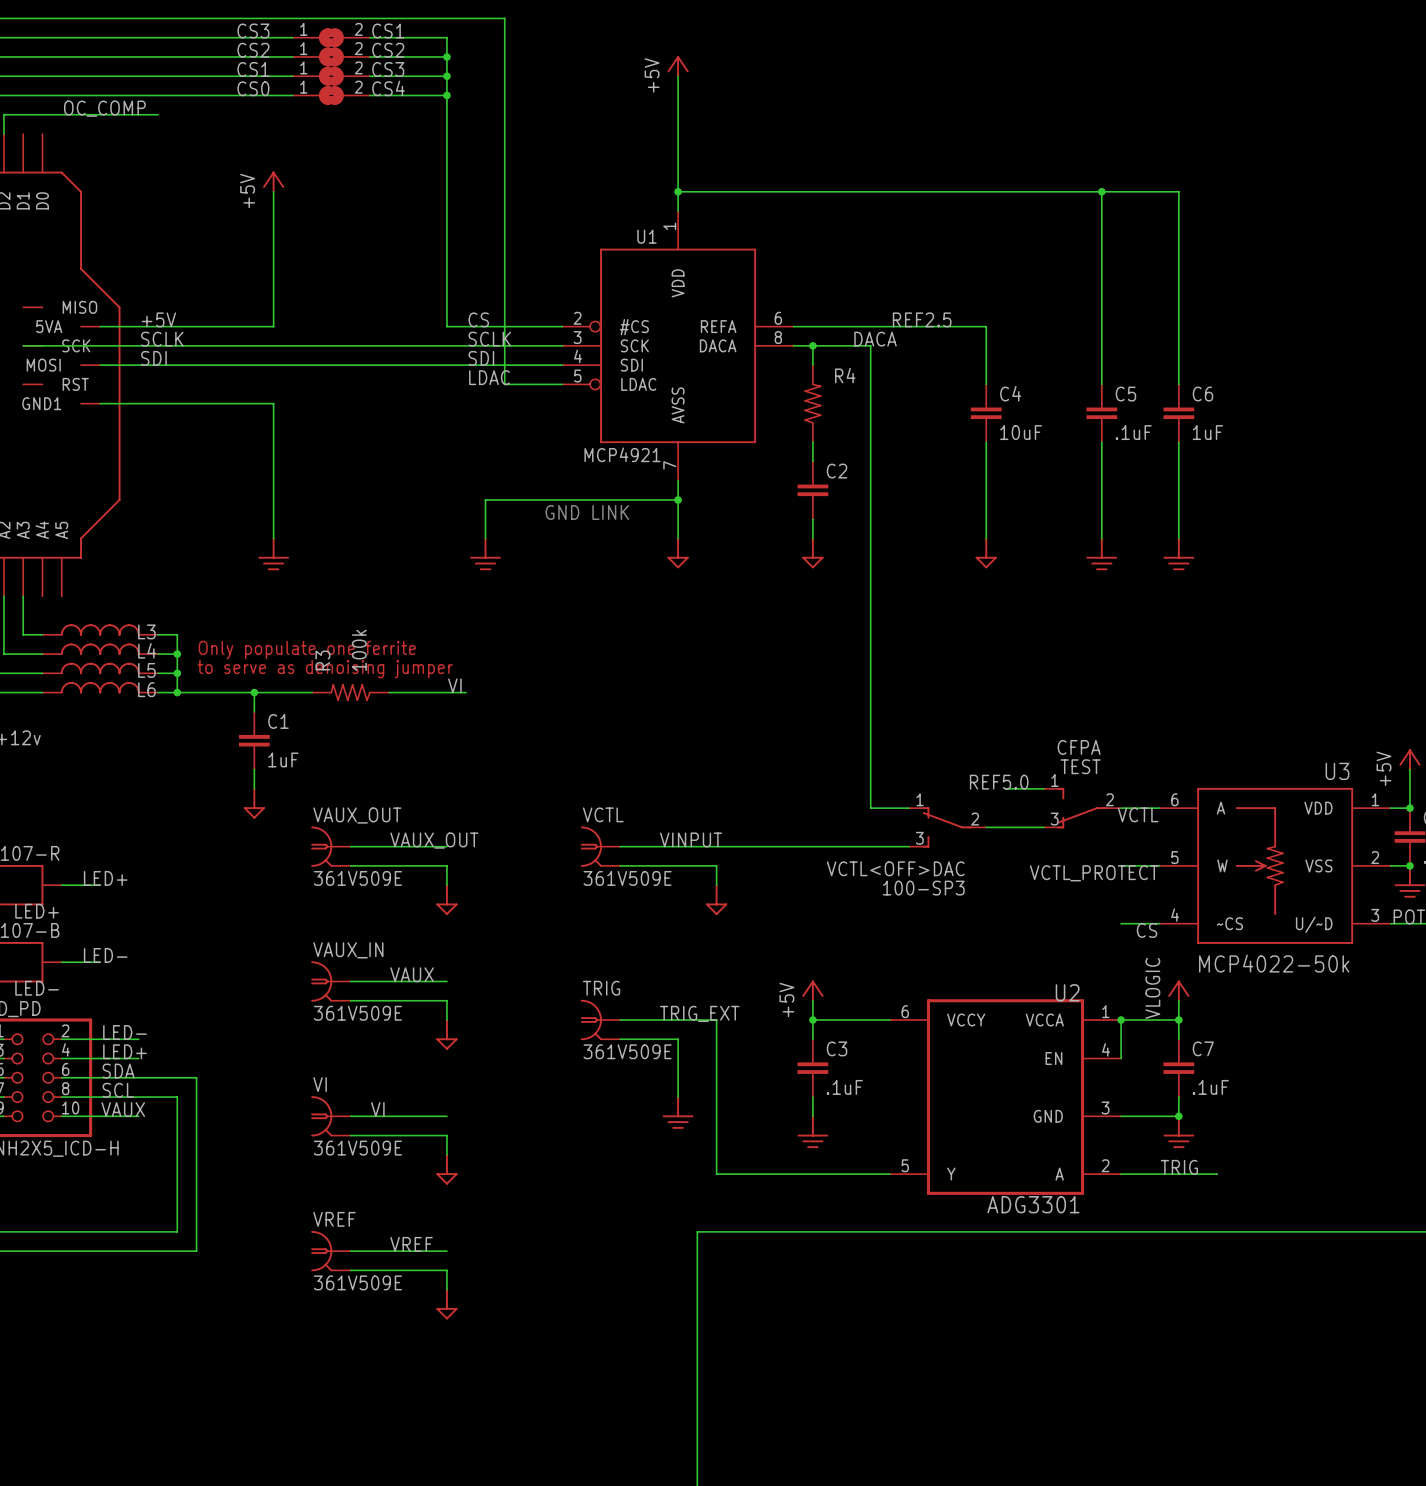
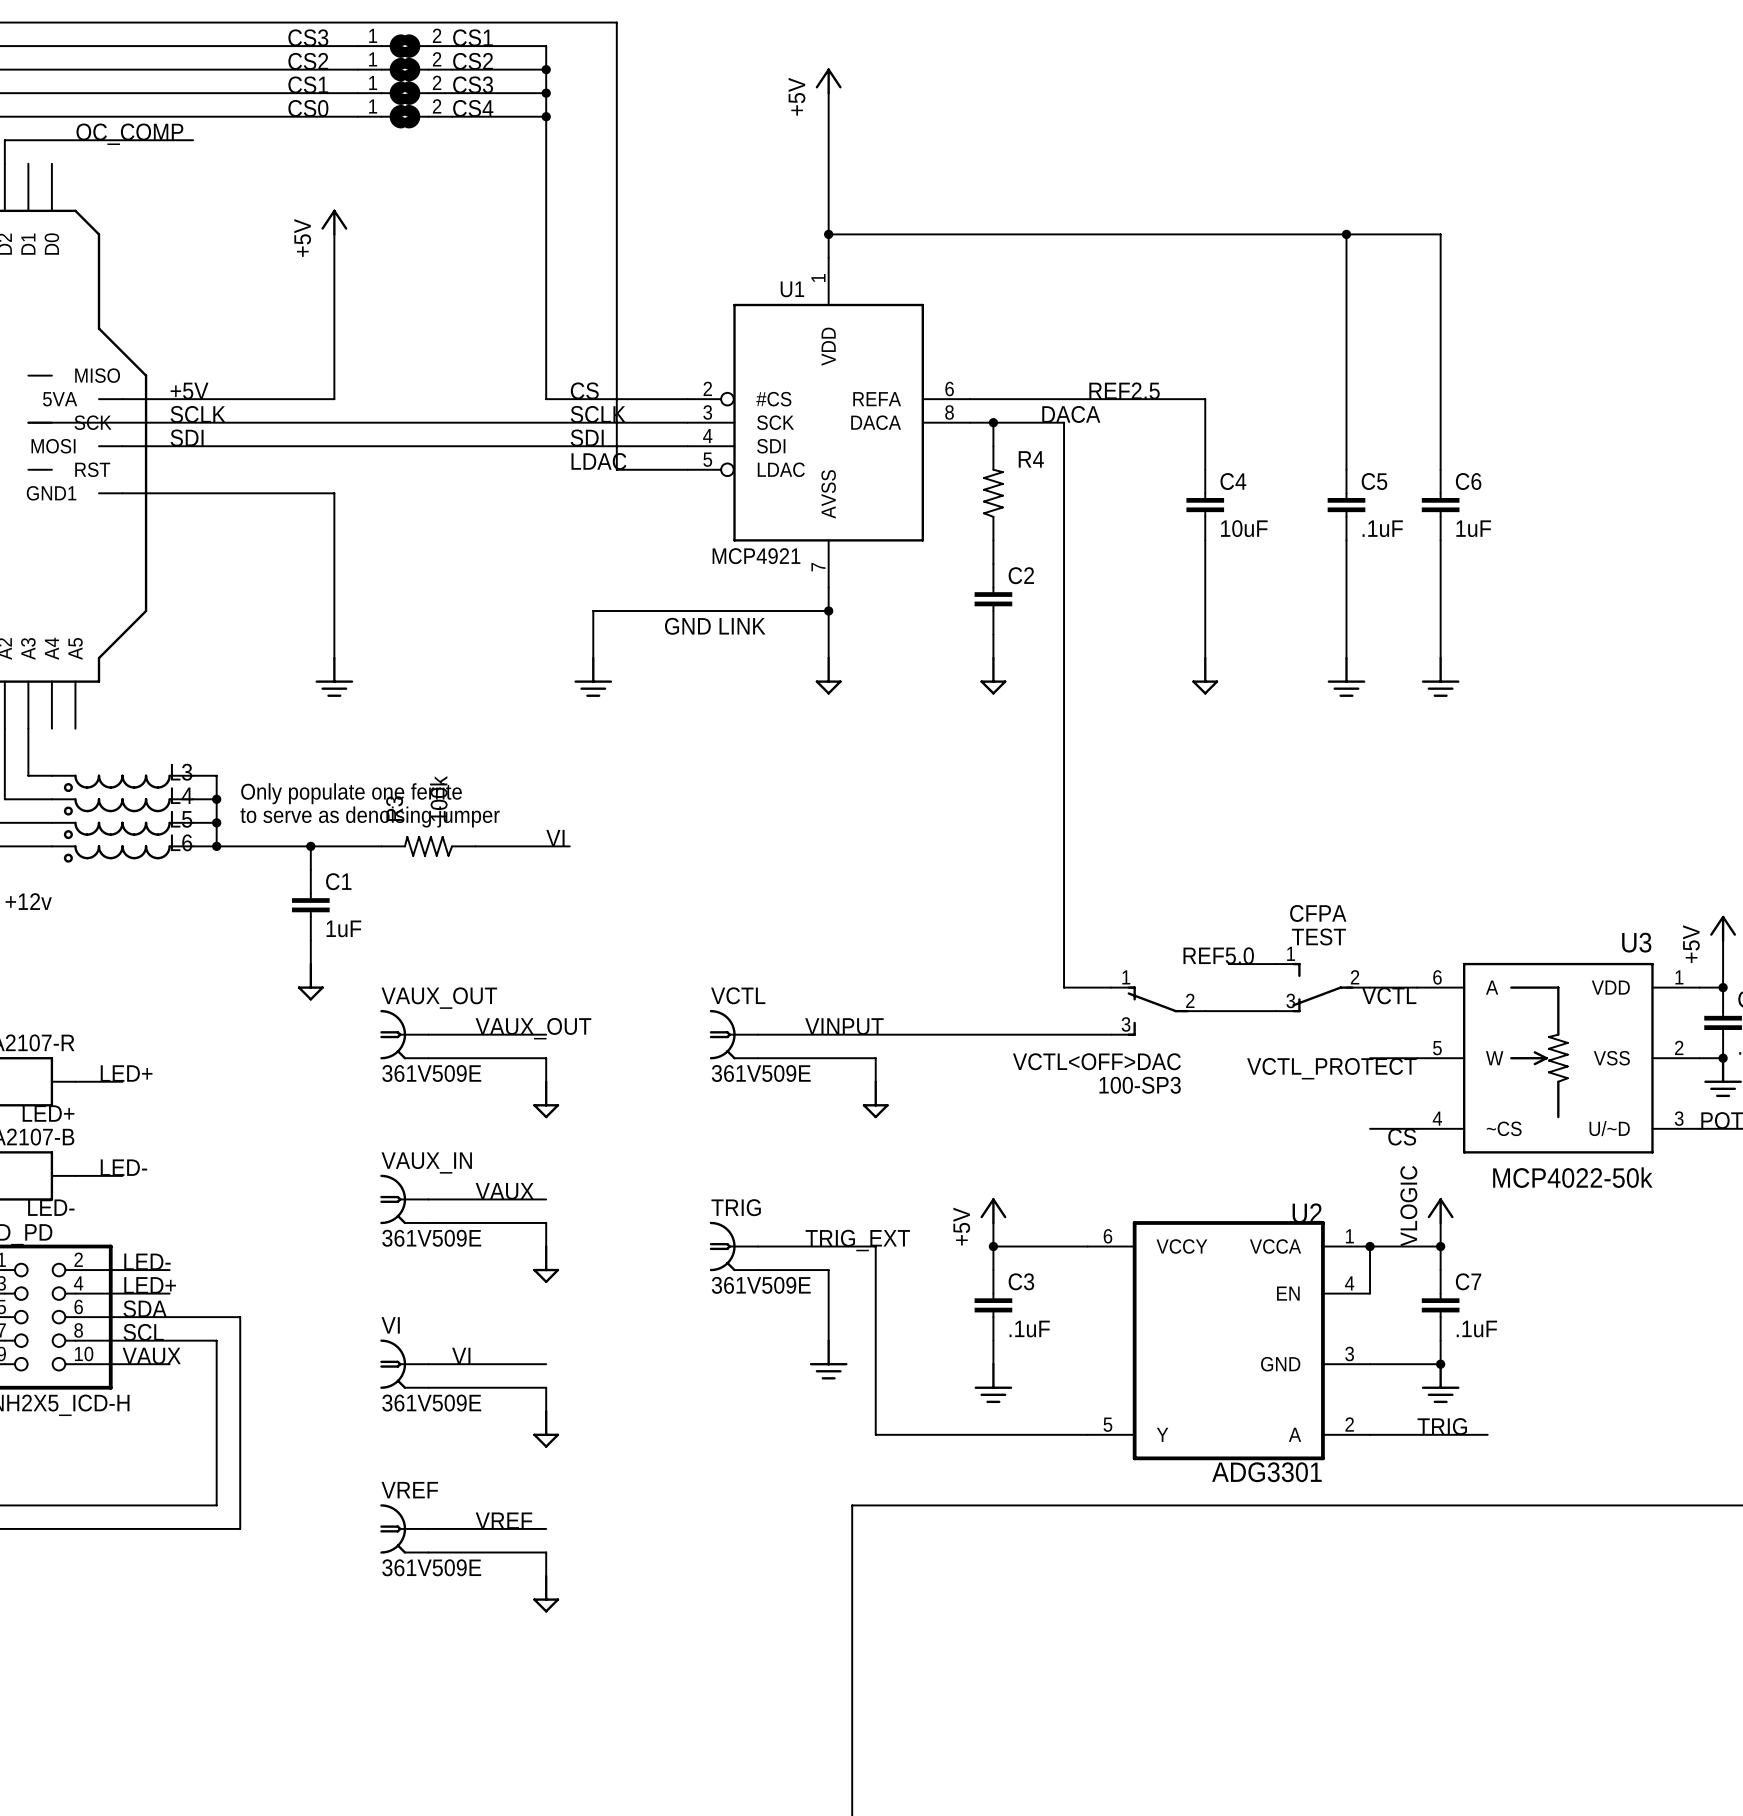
L3 symbol: [42, 624, 159, 636] -> [51, 774, 194, 793]
L4 symbol: [42, 643, 159, 656] -> [51, 798, 194, 816]
L5 symbol: [42, 662, 159, 675] -> [51, 821, 194, 840]
L6 symbol: [42, 681, 159, 694] -> [51, 845, 194, 863]

